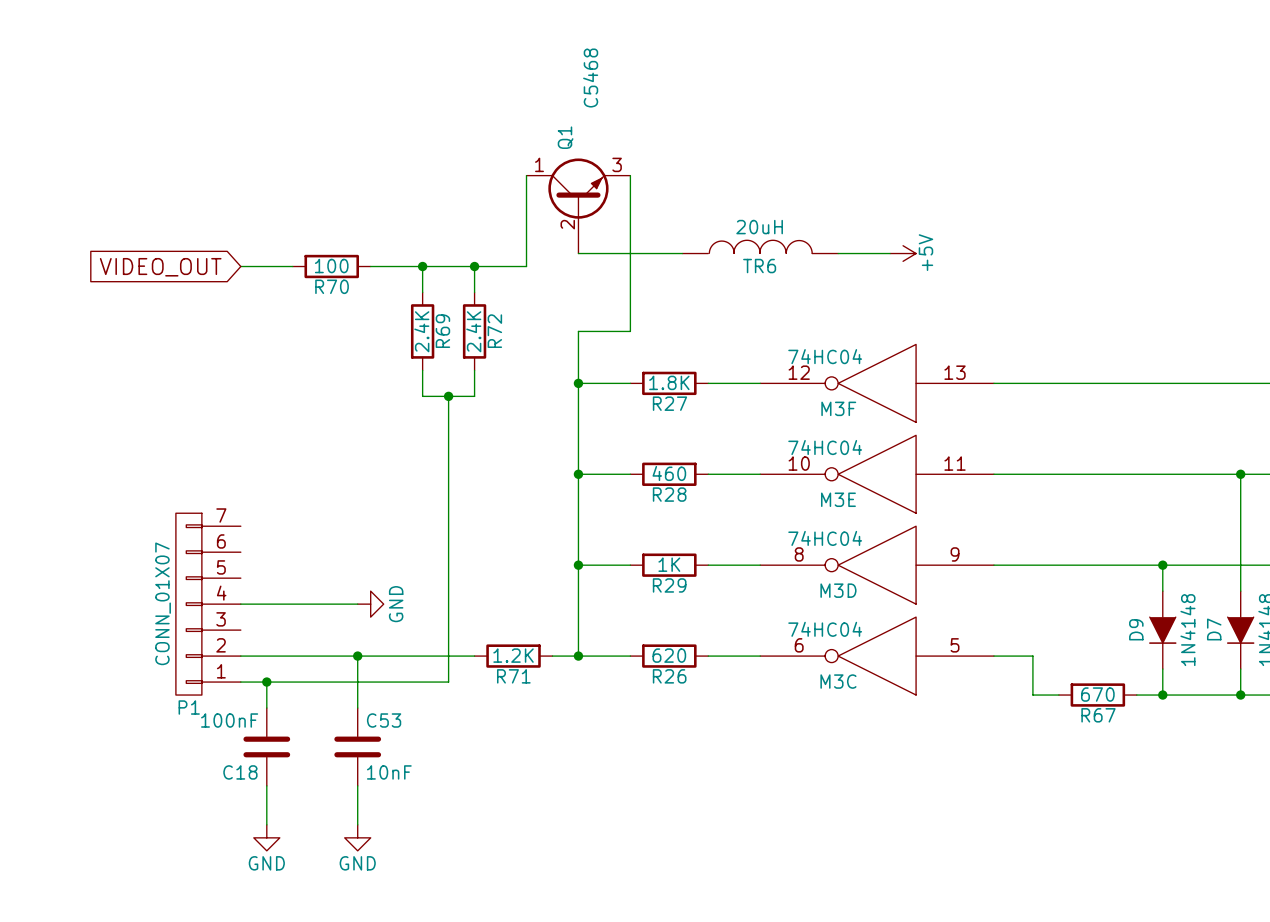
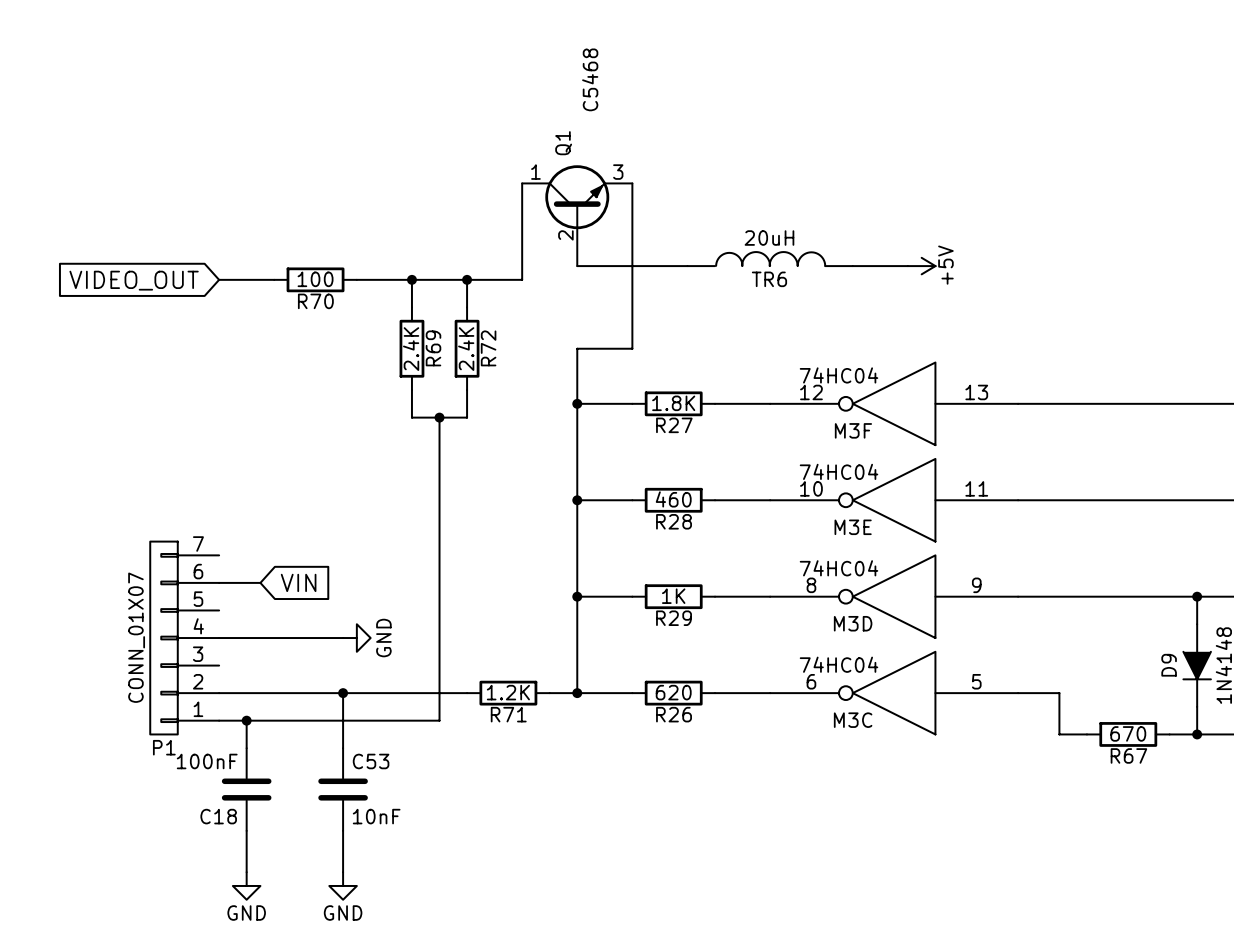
wire: none -> (219, 582) (260, 582)
global label: none -> VIN (298, 582)

